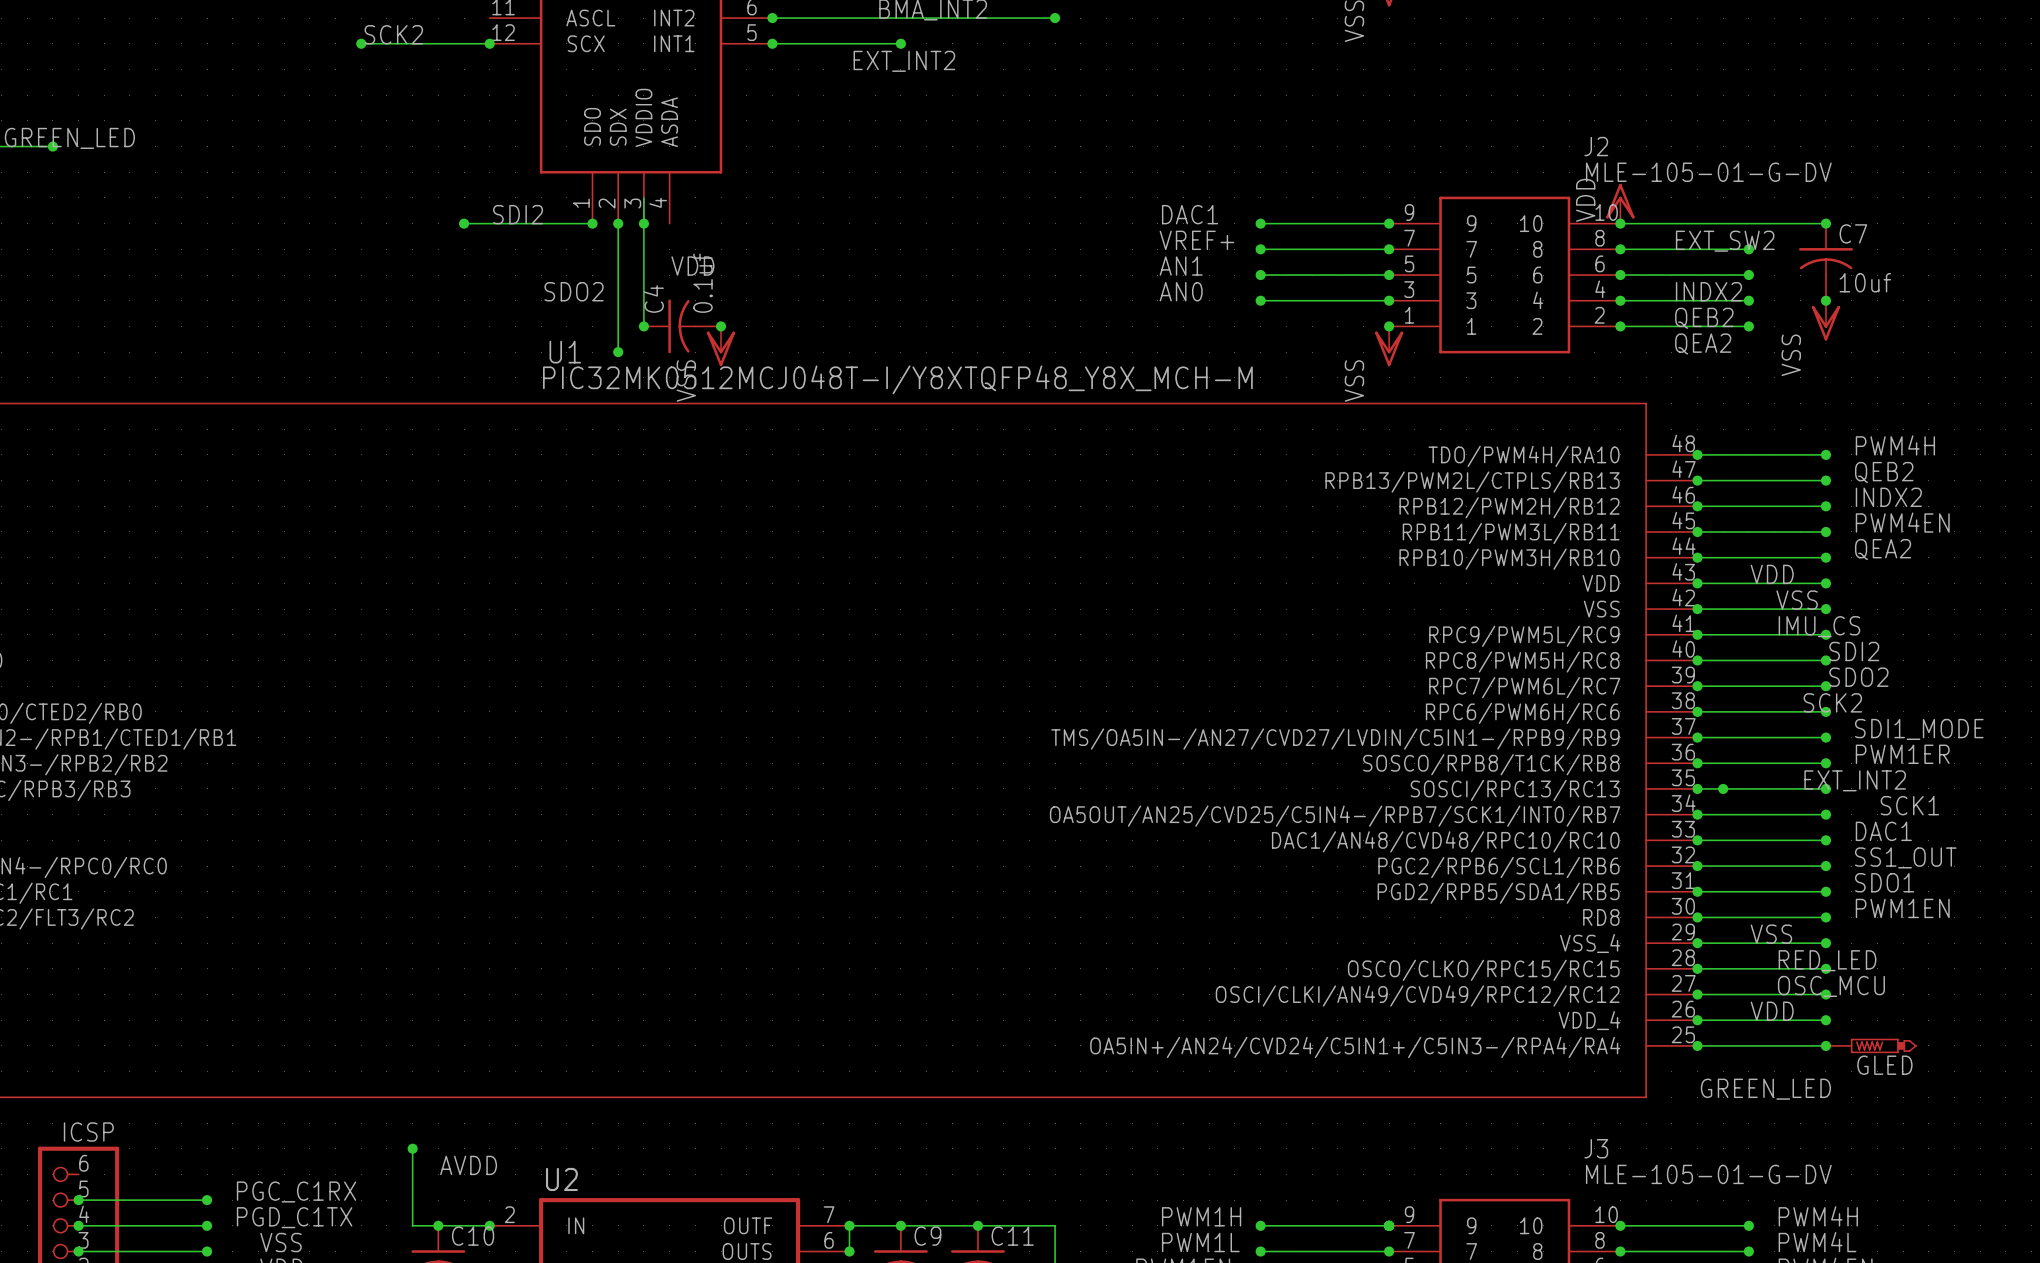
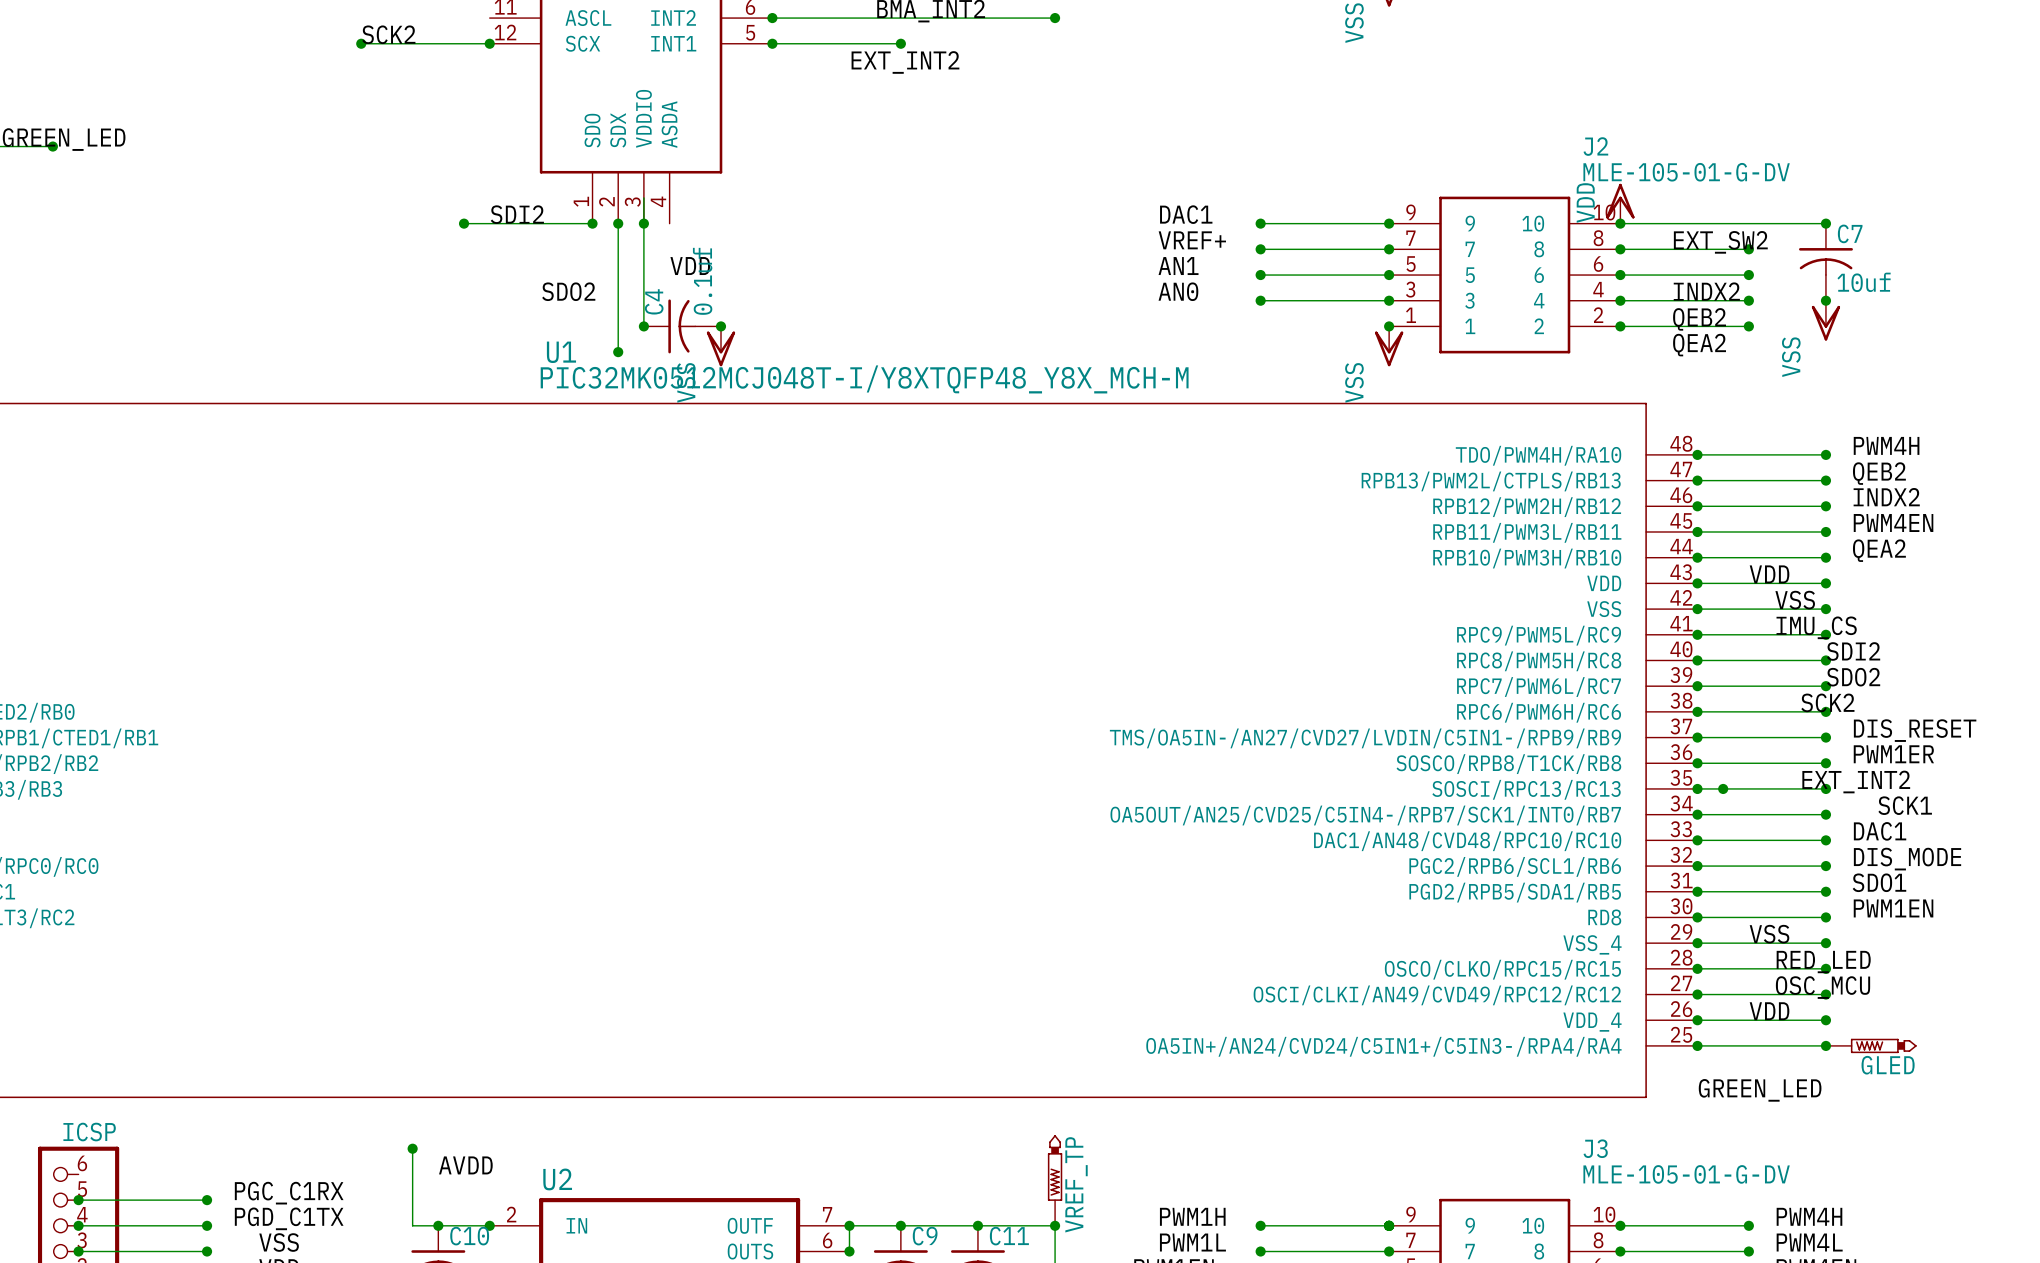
label: SDI1_MODE (1919, 729) -> DIS_RESET (1915, 730)
label: SS1_OUT (1905, 857) -> DIS_MODE (1907, 859)
VREF_TP: none -> (1055, 1180)
junction: none -> (1055, 1225)

